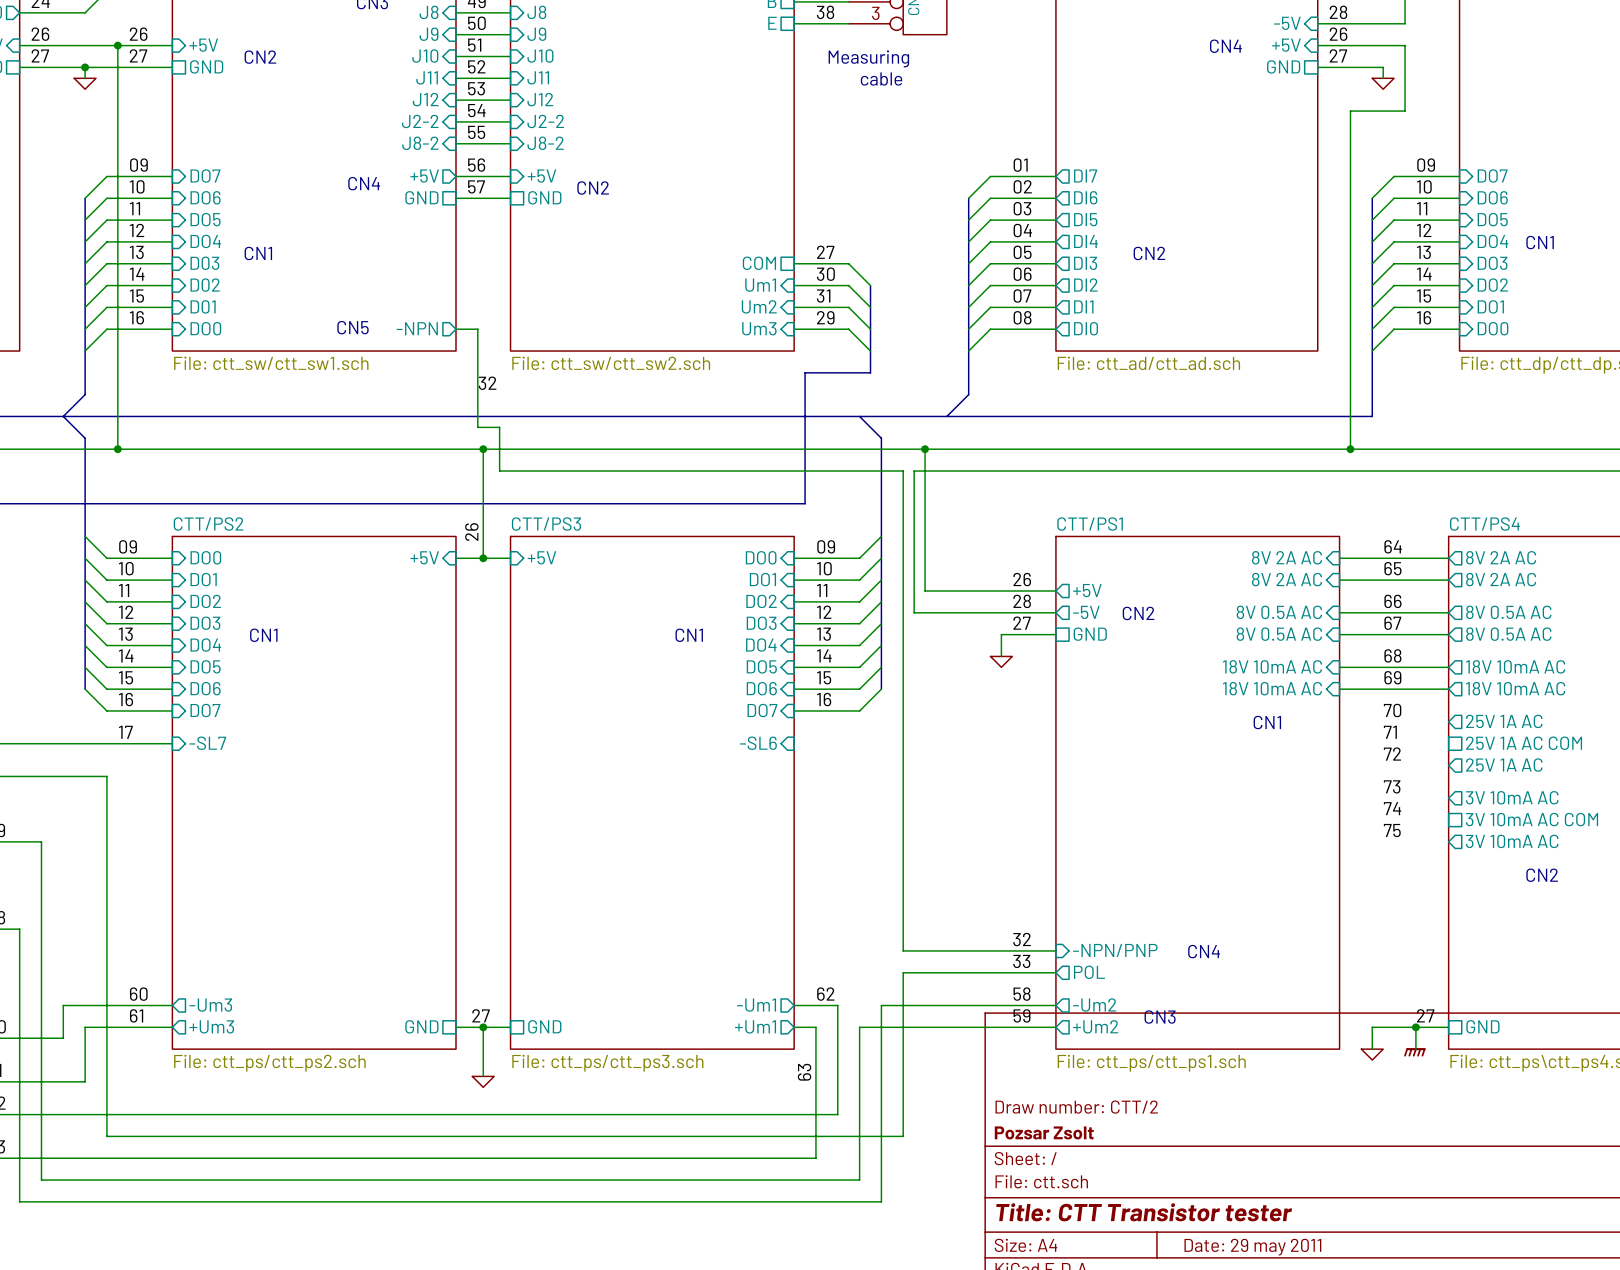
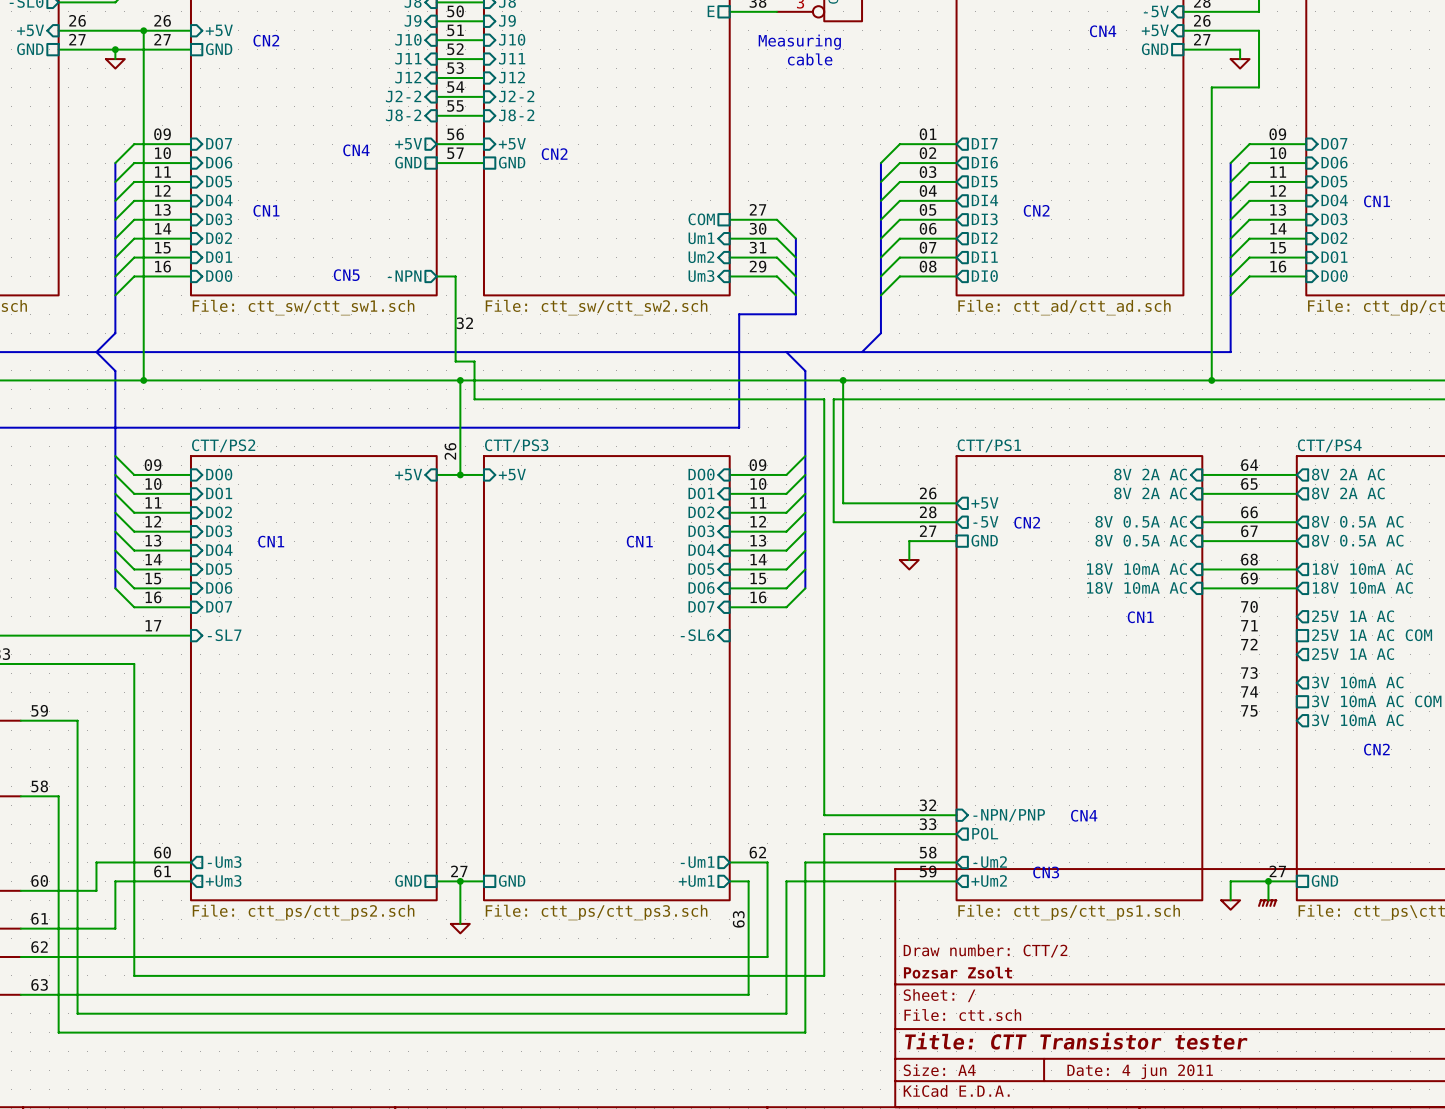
title block: Date: 29 may 2011 (1252, 1247) -> Date: 4 jun 2011 (1140, 1071)

